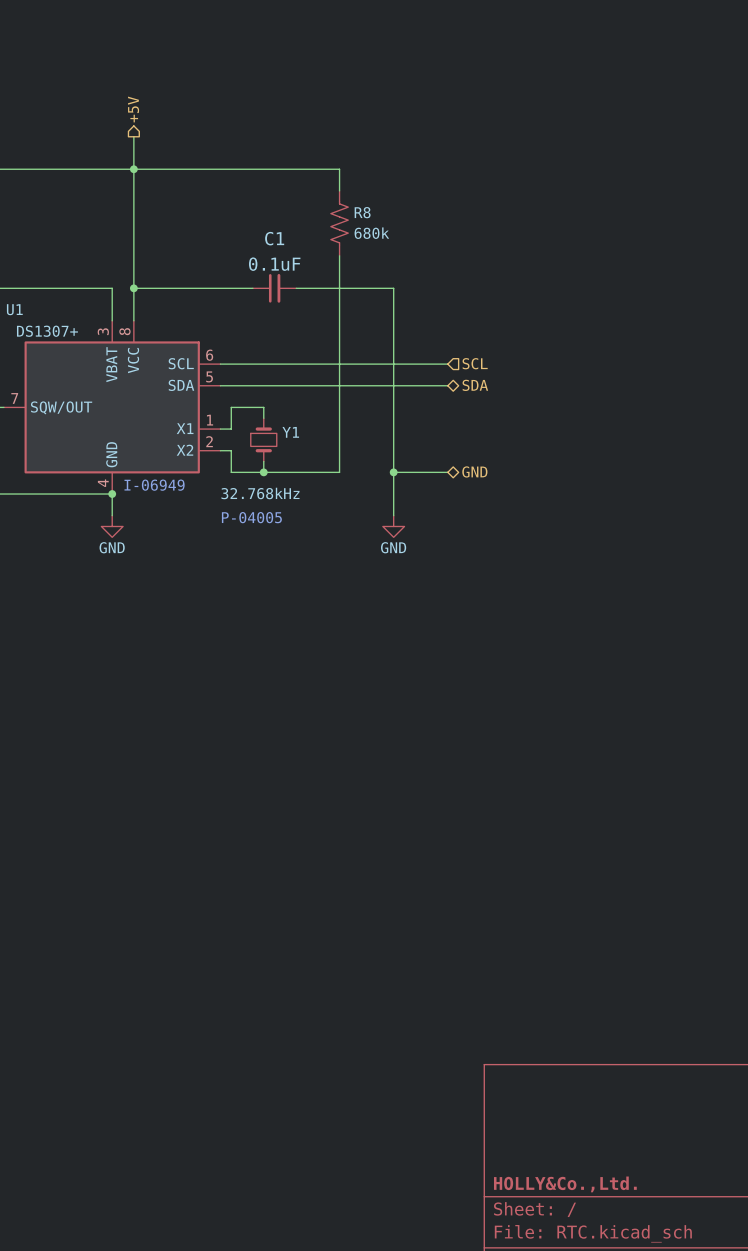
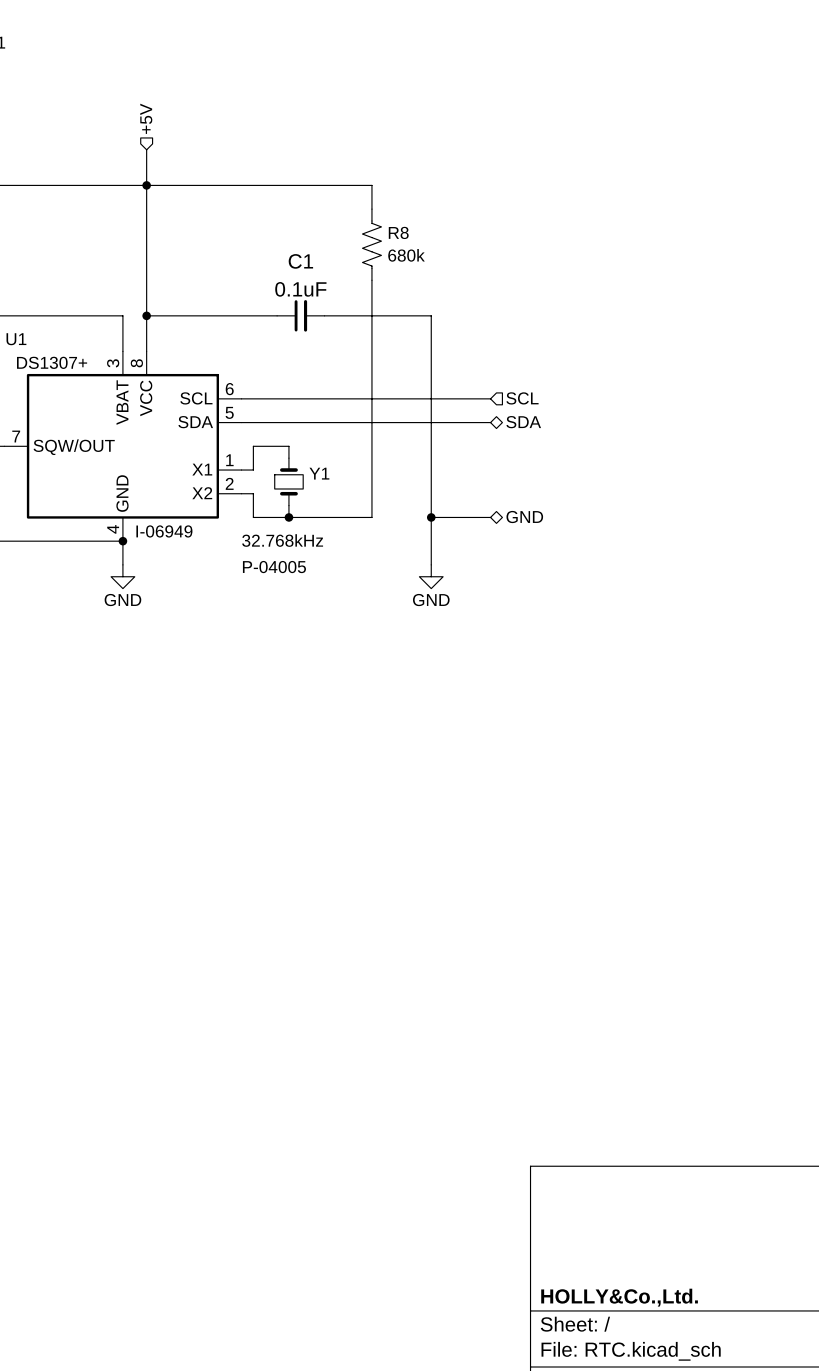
hierarchical label shape: output (133, 109) -> input (146, 118)

